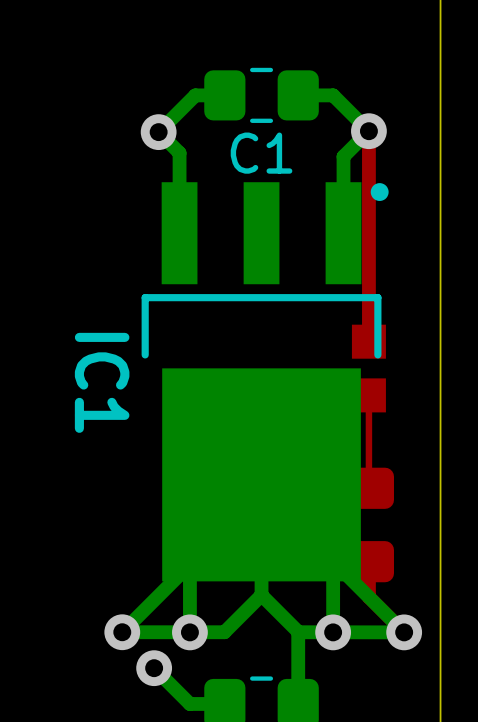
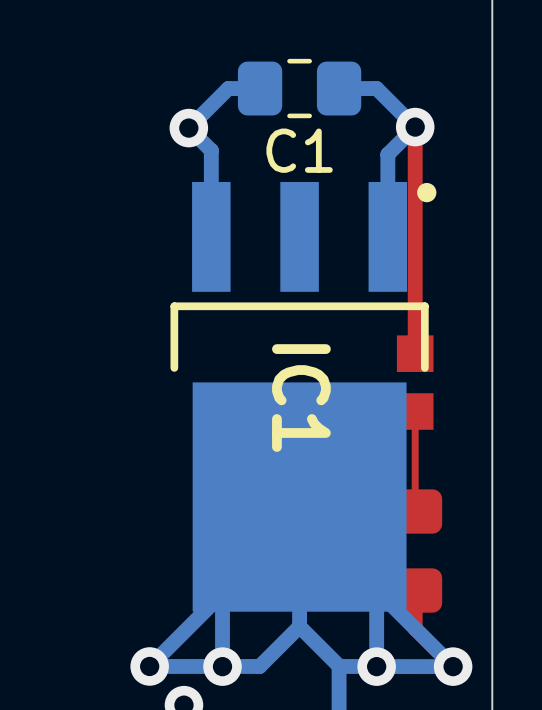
IC1 name position: IC1 (102, 382) -> IC1 (301, 398)

